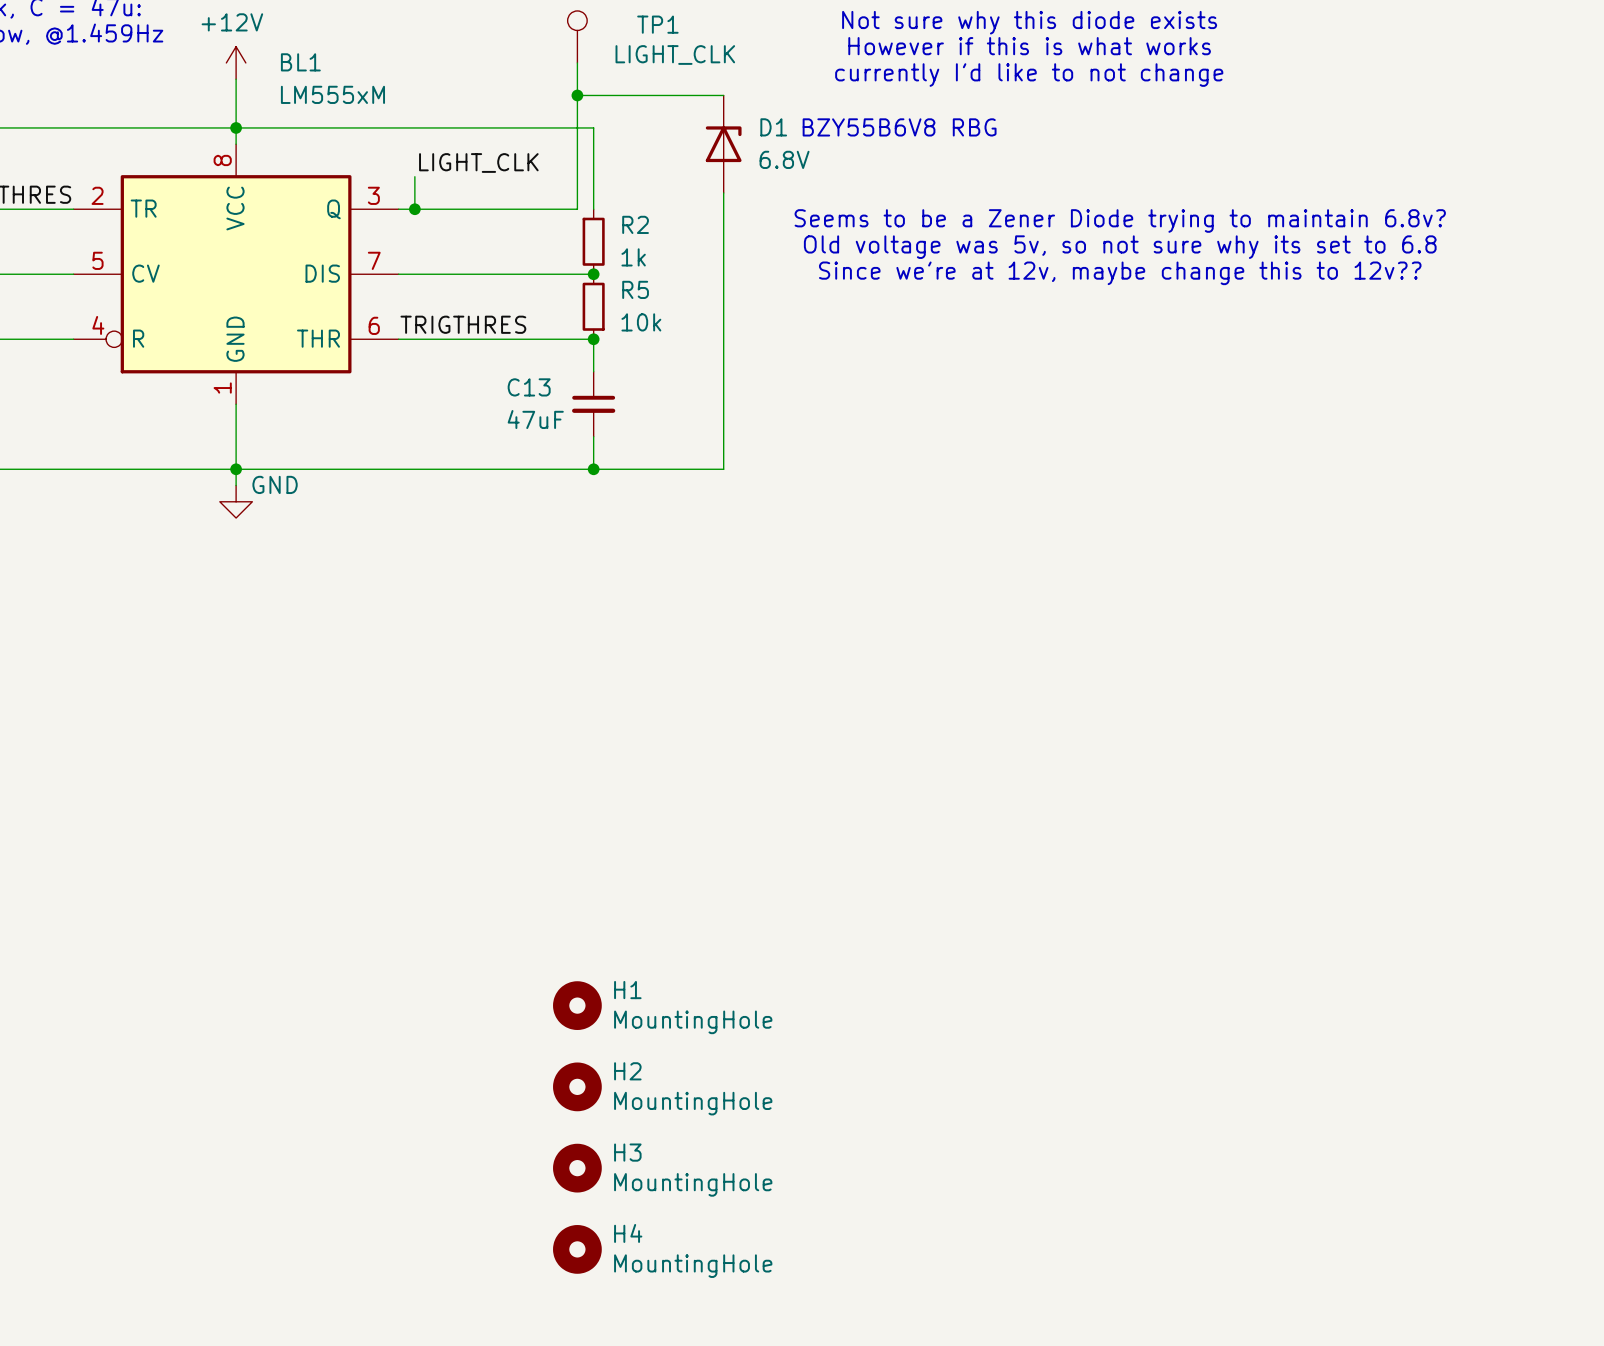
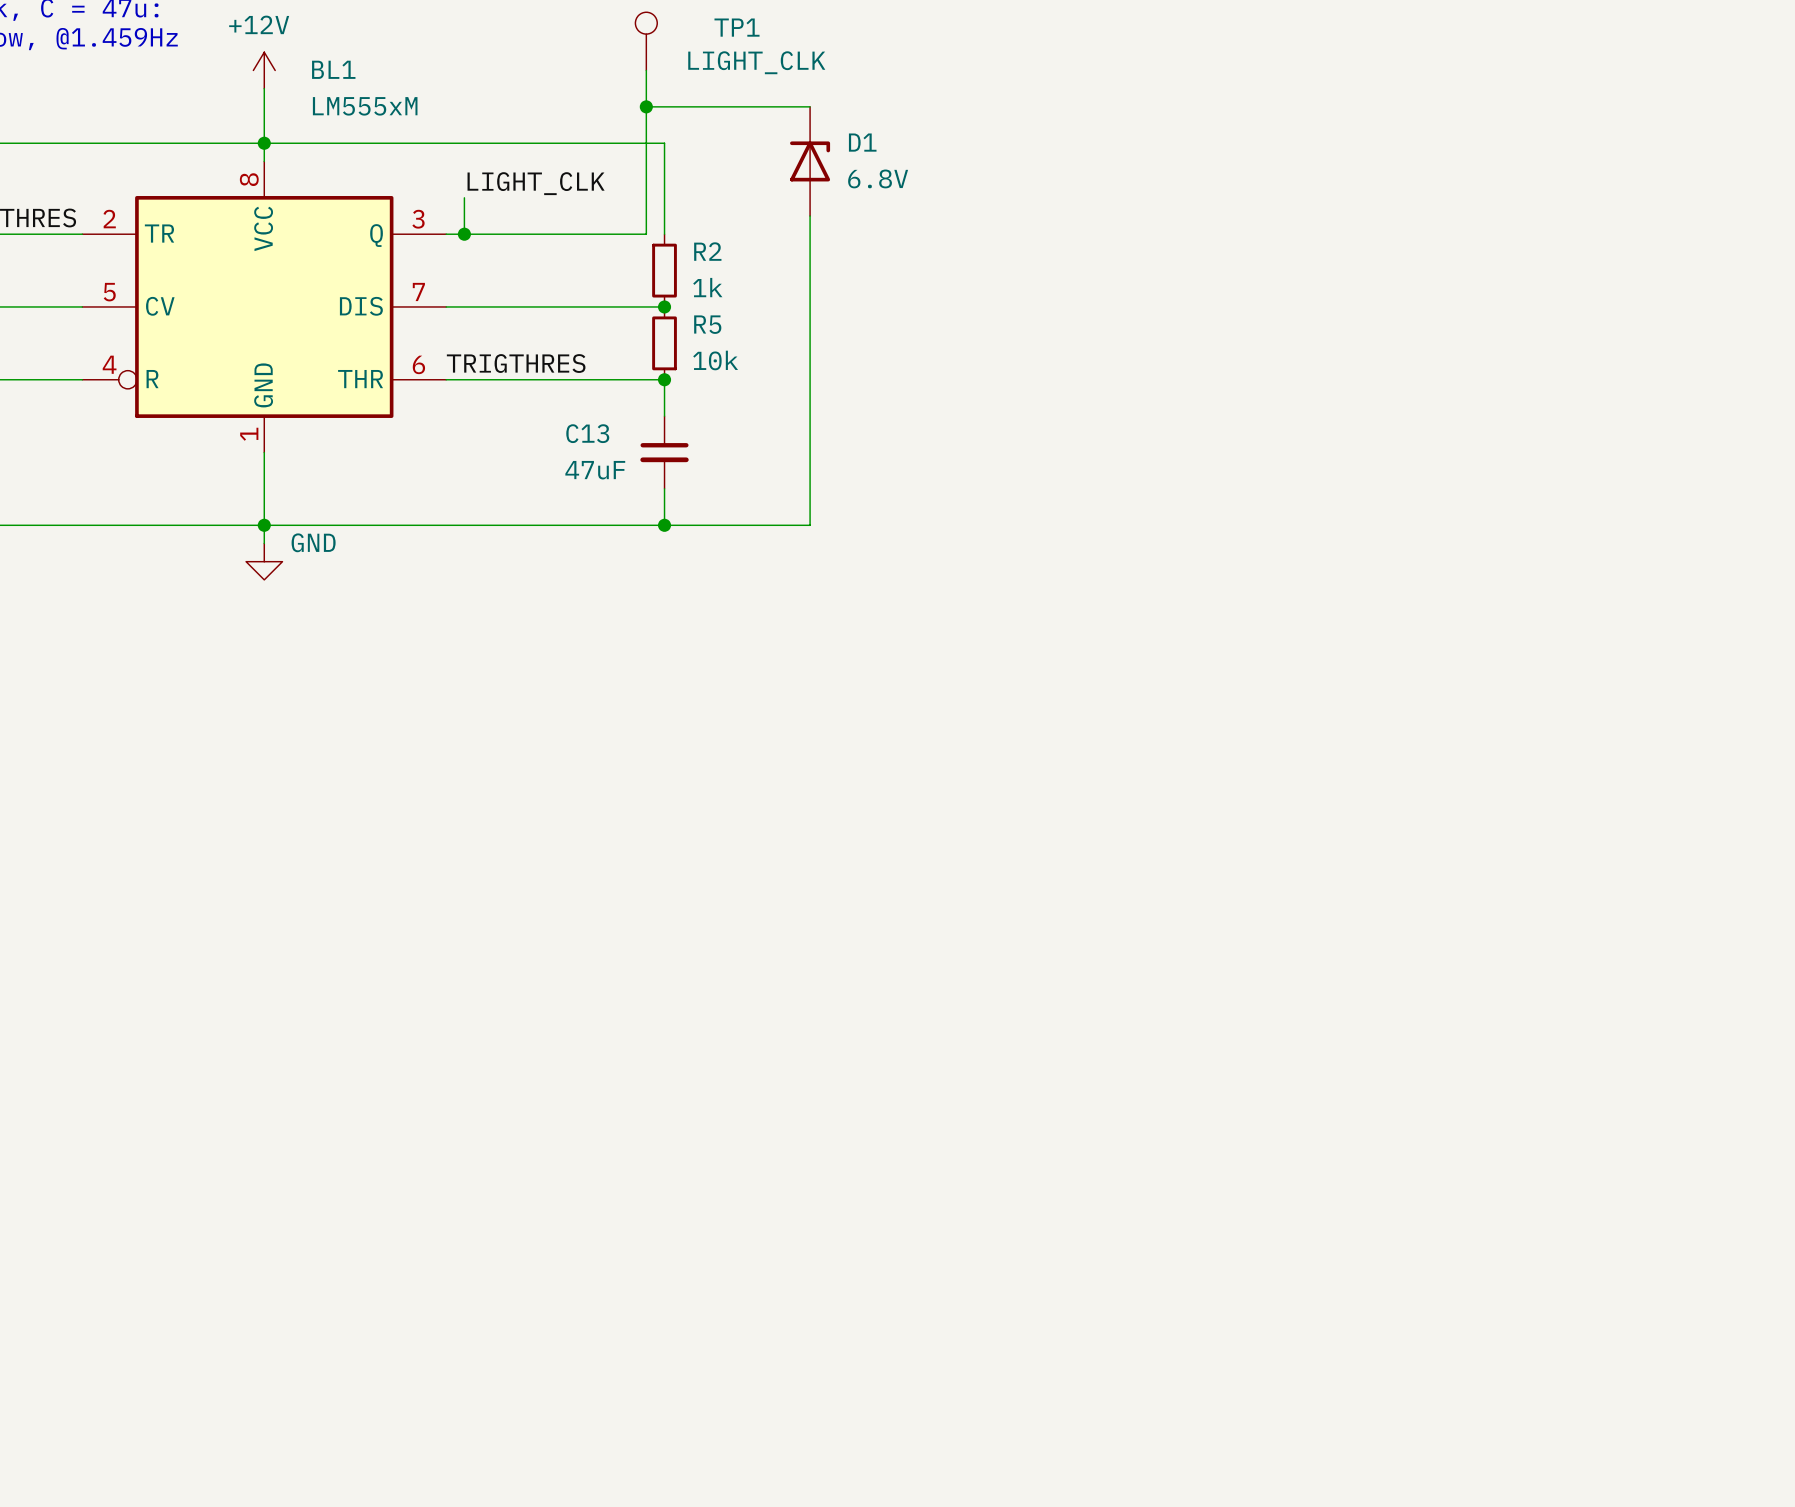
text: Not sure why this diode exists (1029, 22) -> none
text: However if this is what works (1029, 46) -> none
text: currently I'd like to not change (1029, 75) -> none
text: BZY55B6V8 RBG (899, 127) -> none
text: Seems to be a Zener Diode trying to maintain 6.8v? (1120, 220) -> none
text: Old voltage was 5v, so not sure why its set to 6.8 (1120, 247) -> none
text: Since we're at 12v, maybe change this to 12v?? (1120, 273) -> none
H1: MountingHole (577, 1005) -> none
H2: MountingHole (577, 1086) -> none
H3: MountingHole (577, 1168) -> none
H4: MountingHole (577, 1249) -> none

